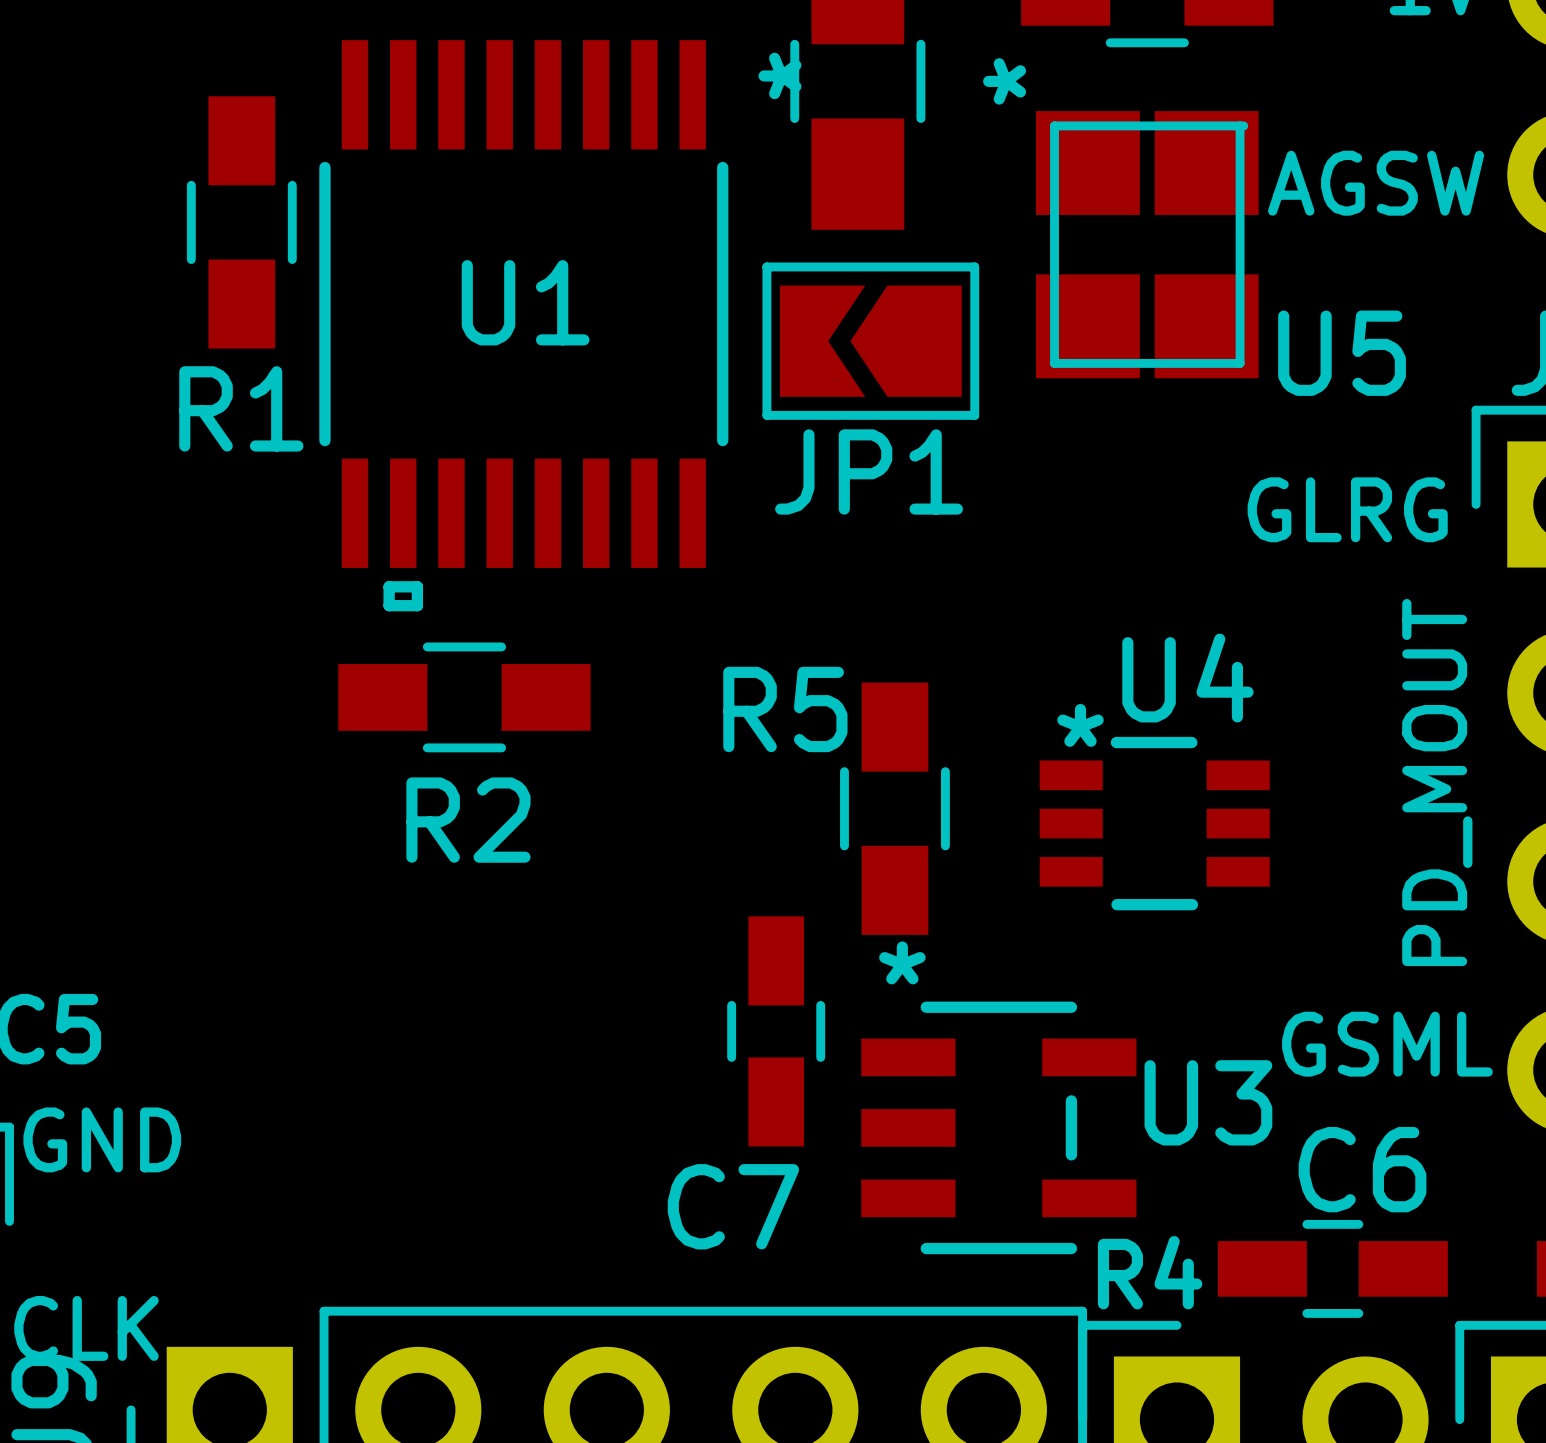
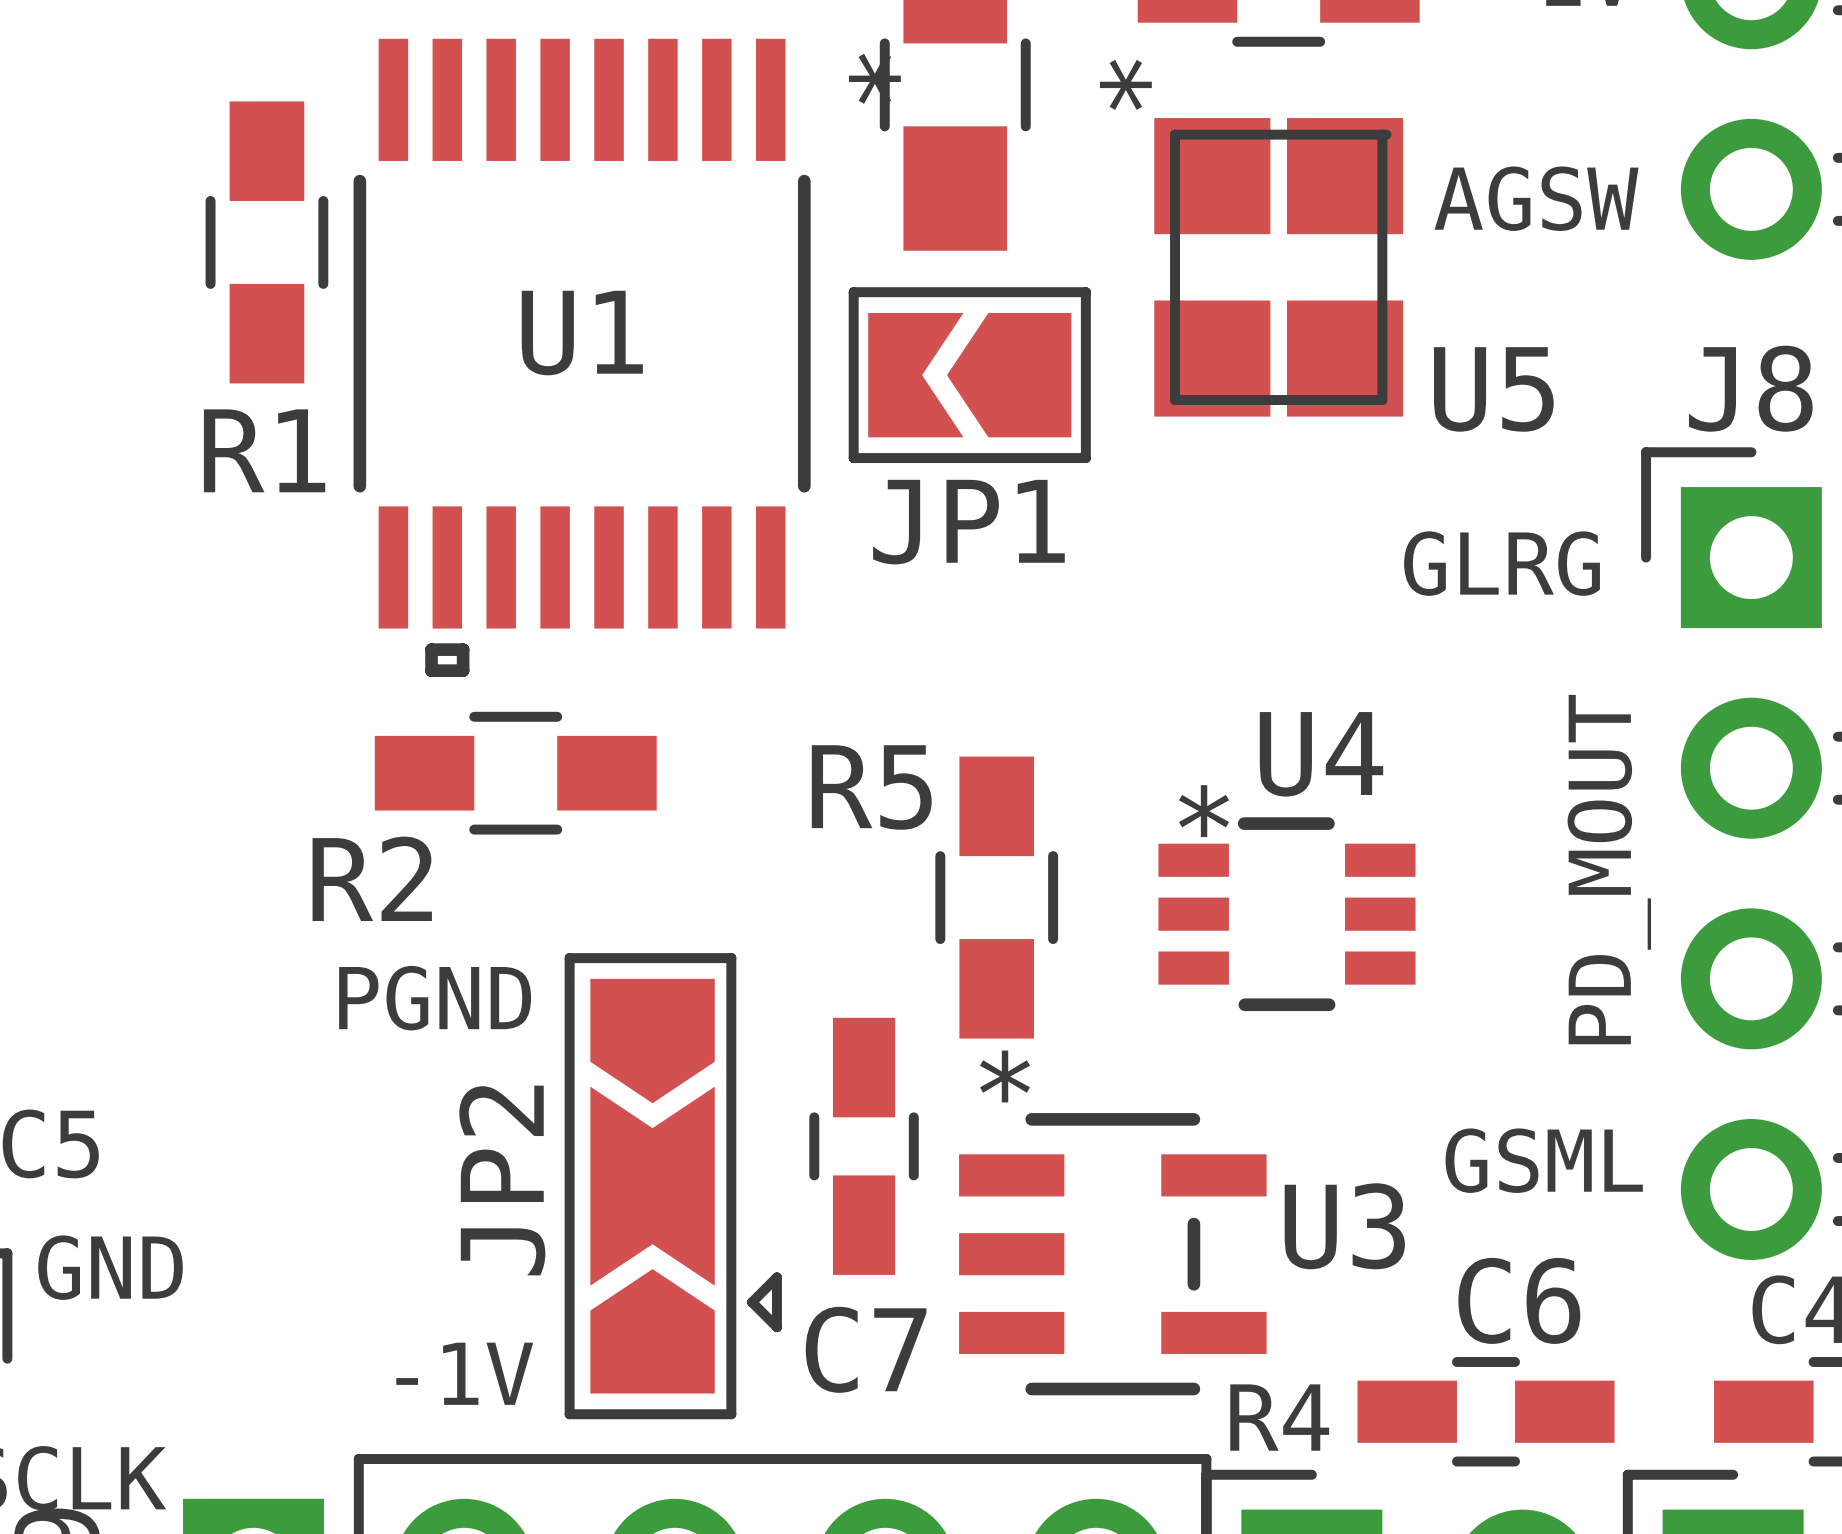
R2 name position: R2 (468, 820) -> R2 (372, 878)
text: none -> PGND (435, 998)
JP2: none -> (673, 1186)
C7 name position: C7 (733, 1206) -> C7 (866, 1349)
text: none -> -1V (464, 1373)

